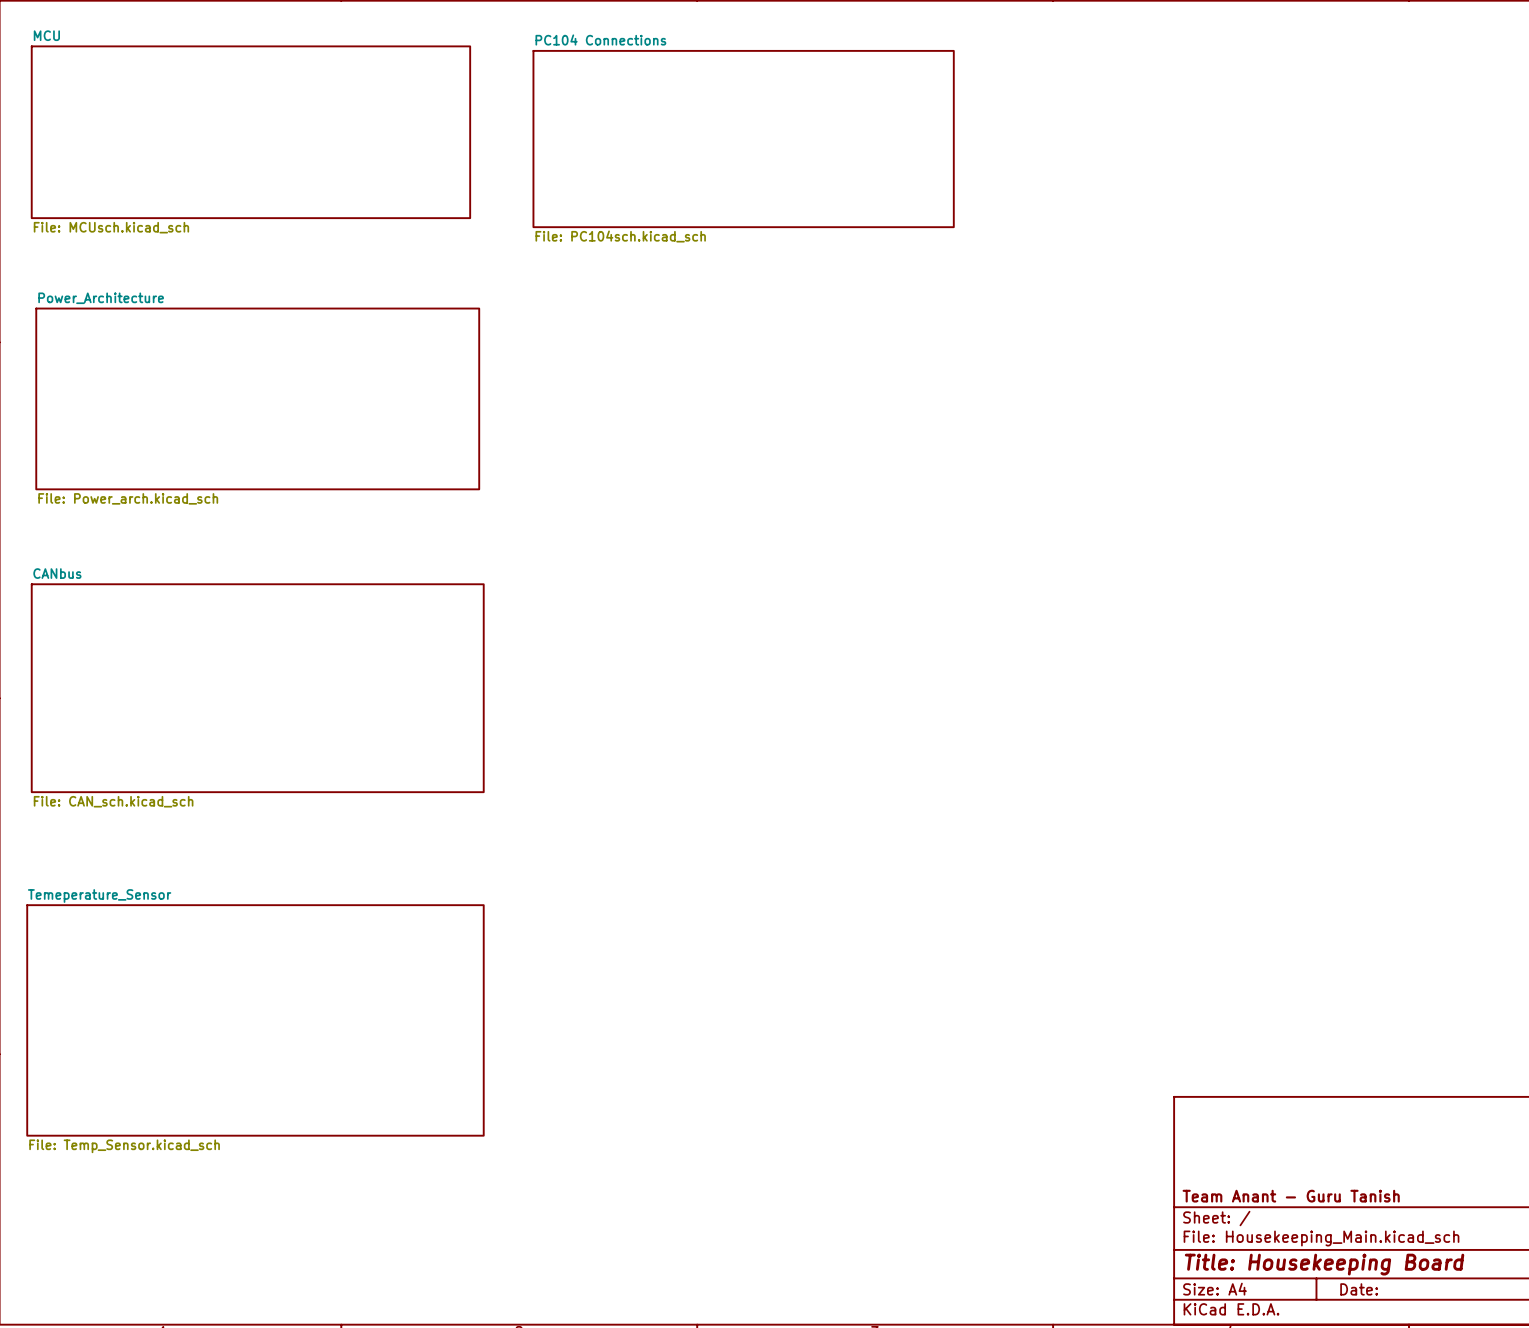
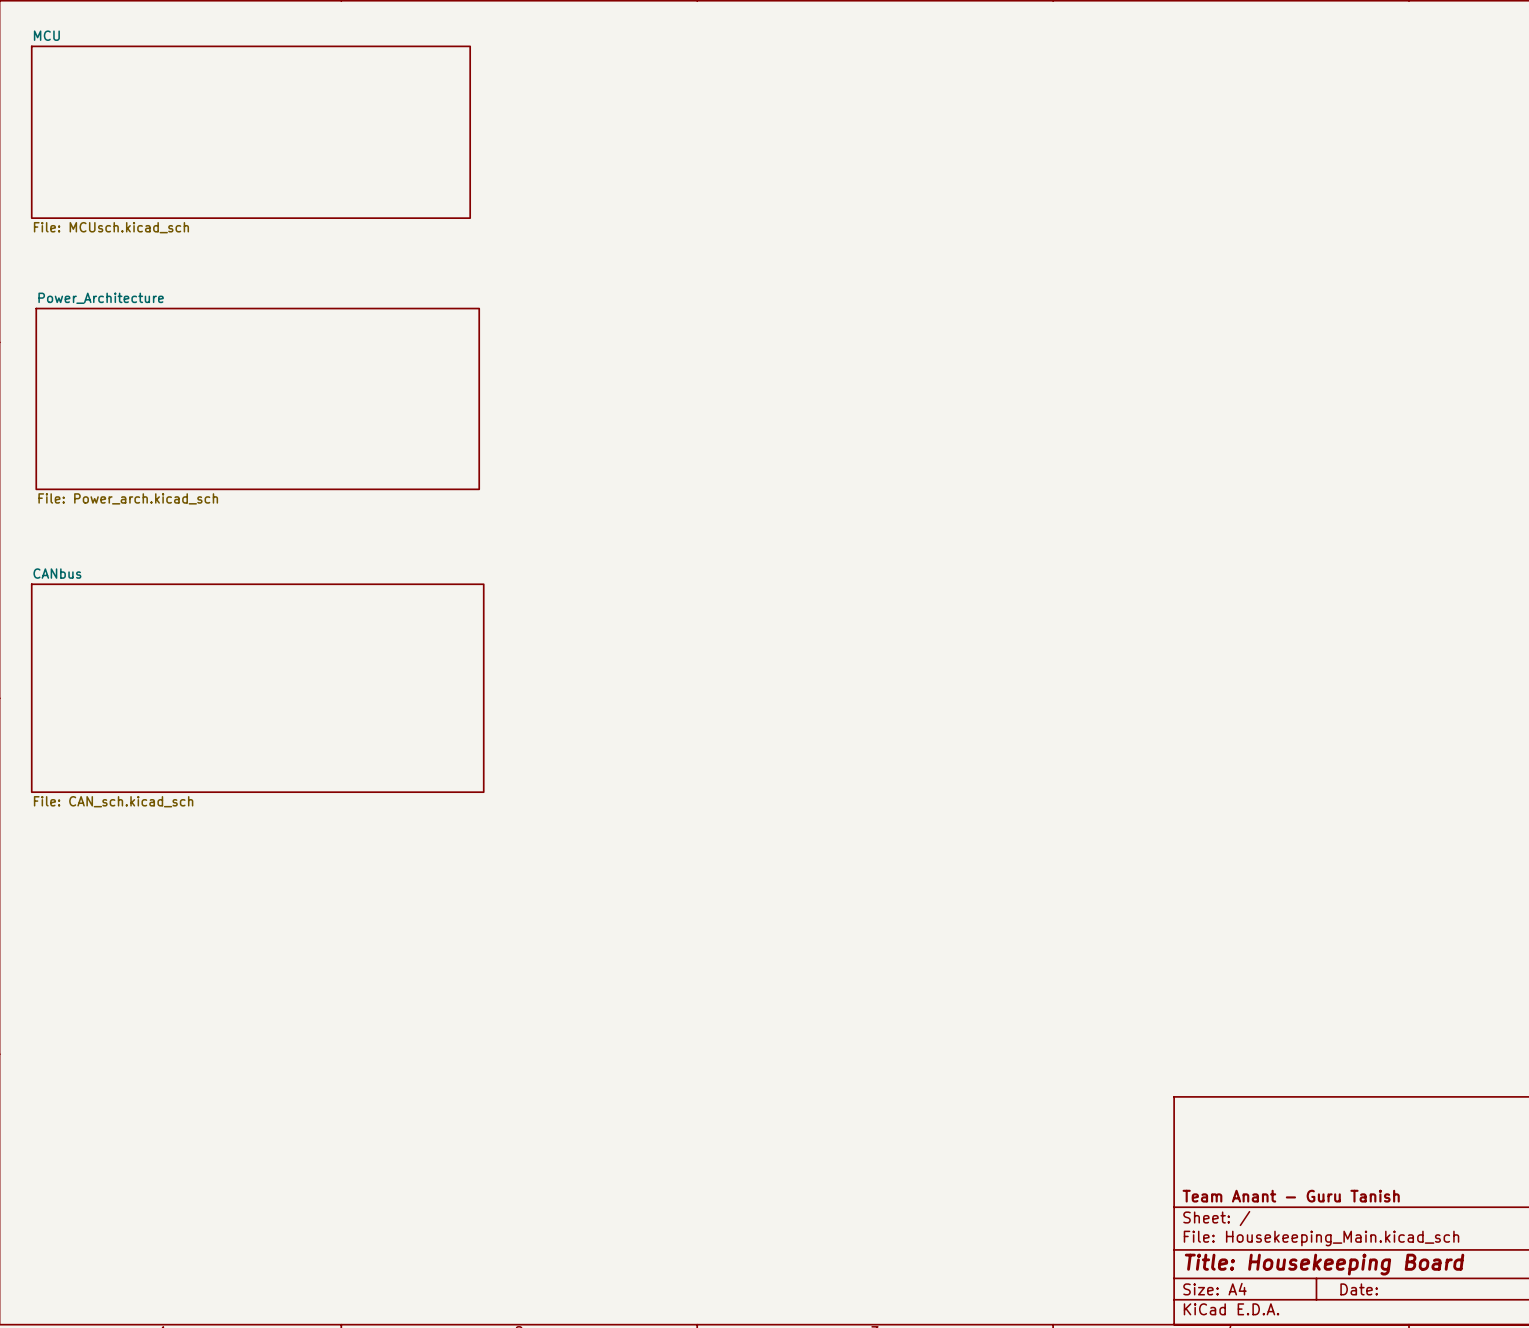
sheet PC104 Connections: File: PC104sch.kicad_sch (743, 139) -> none
sheet Temeperature_Sensor: File: Temp_Sensor.kicad_sch (255, 1020) -> none

